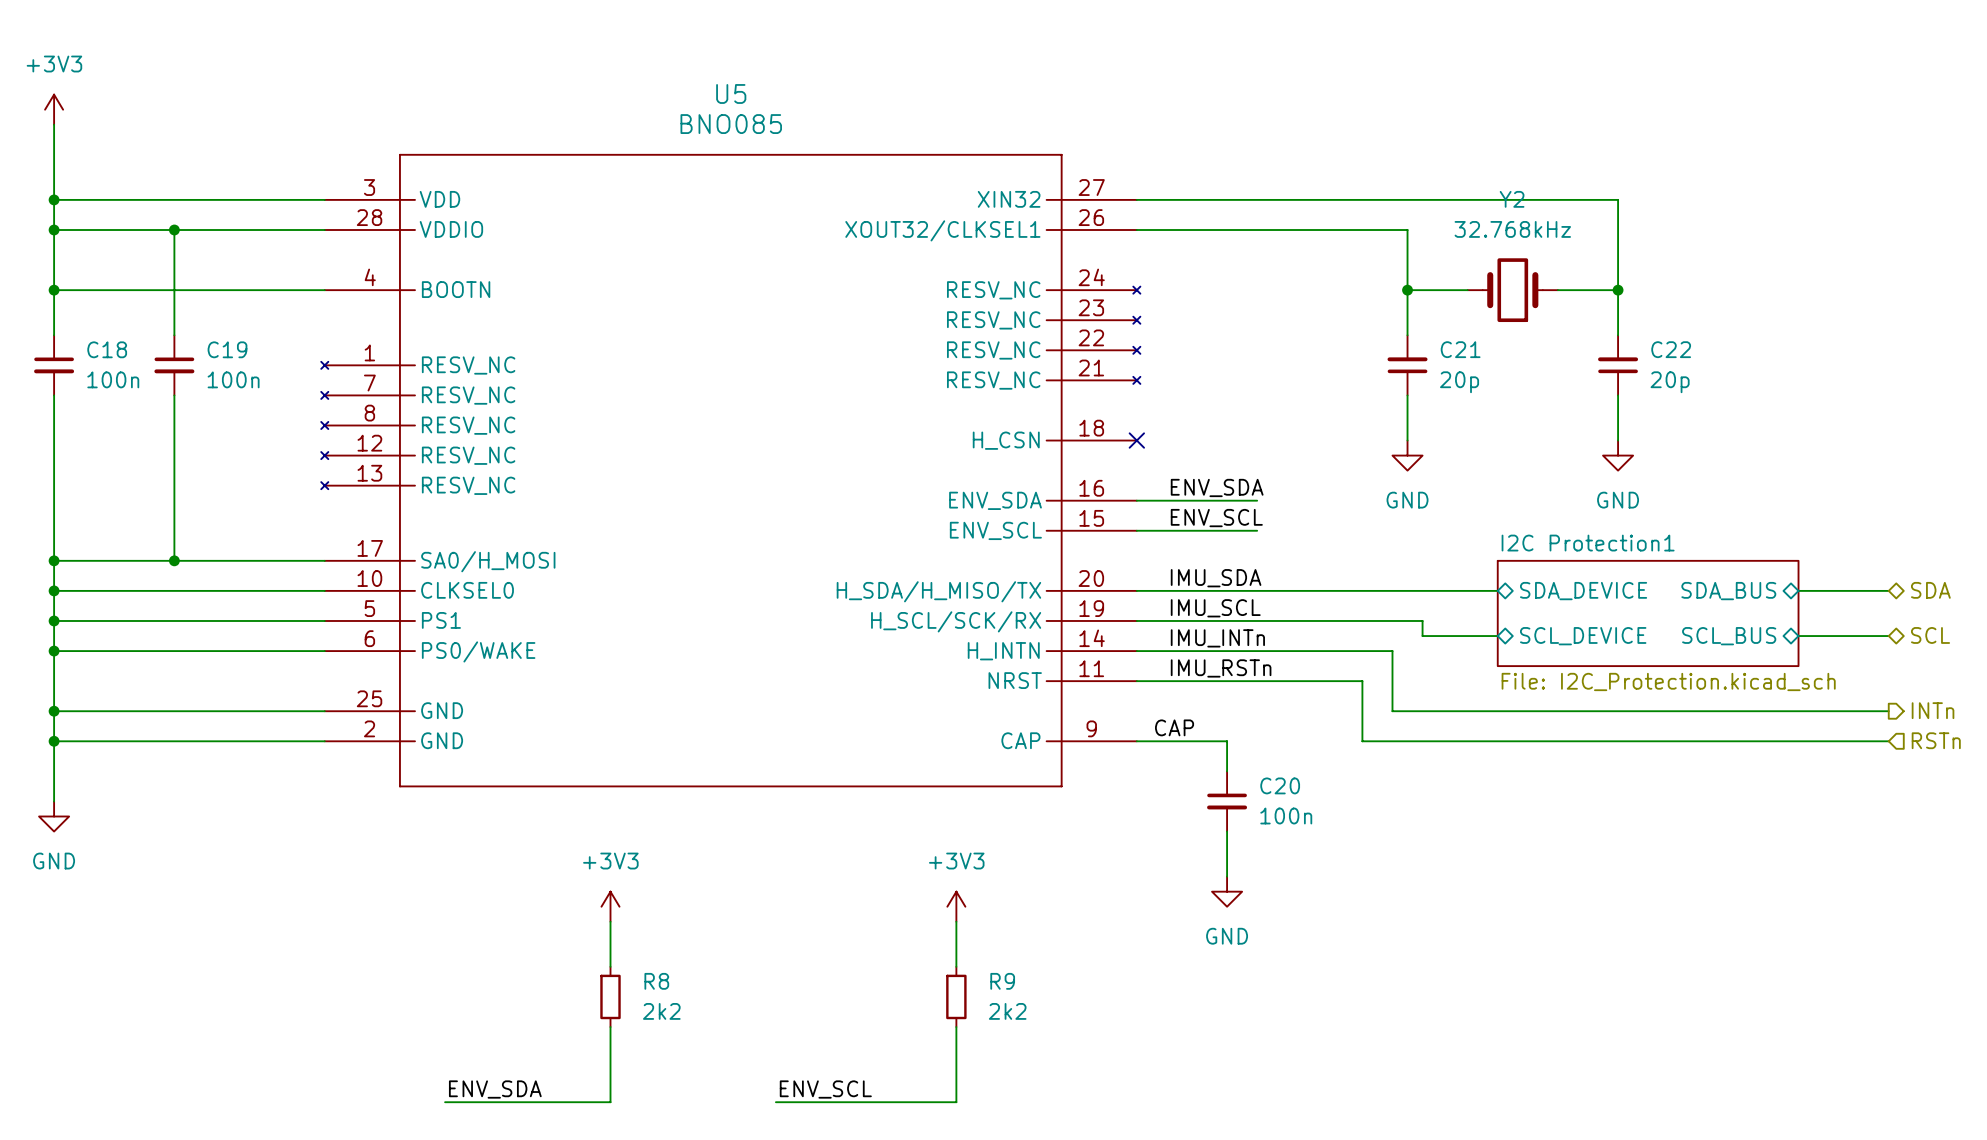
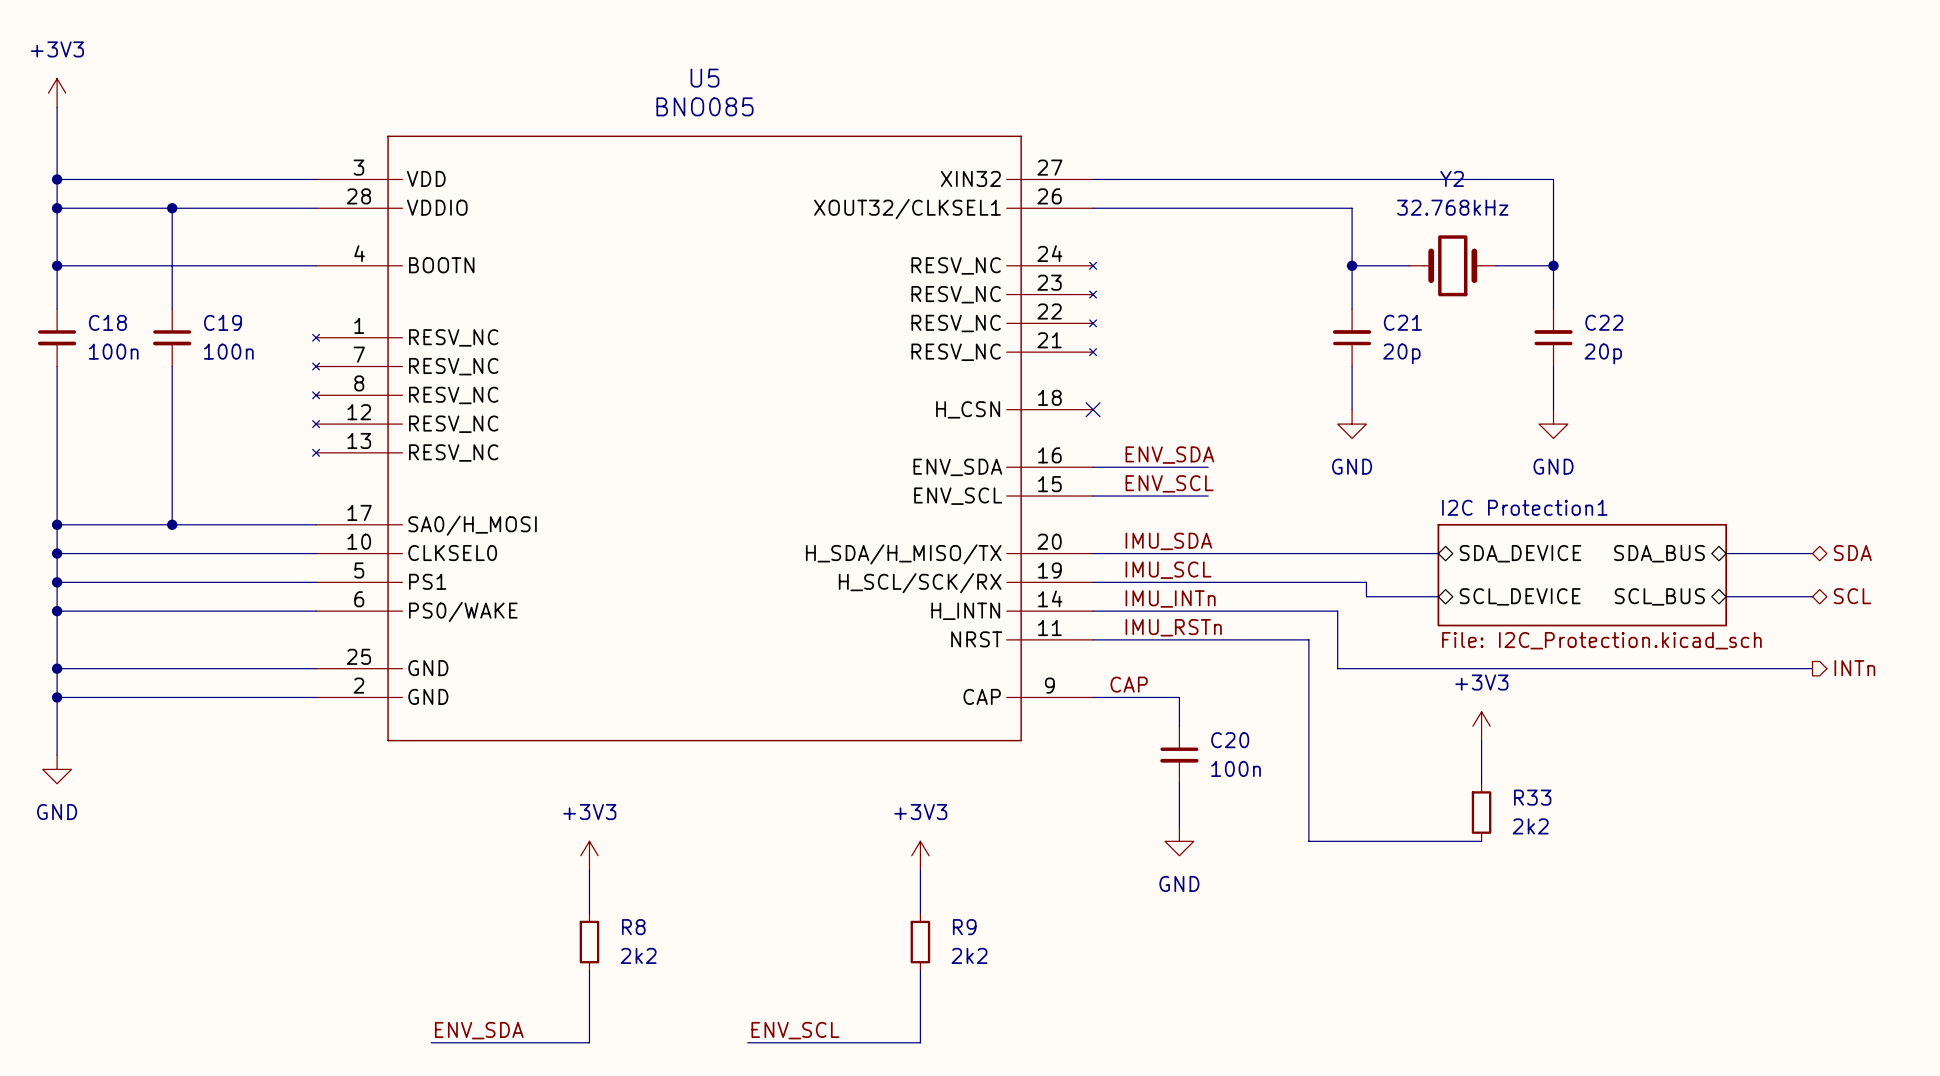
hierarchical label: RSTn (1936, 740) -> none
wire: (1362, 741) (1888, 741) -> (1308, 697) (1308, 841) (1481, 841)
power symbol: none -> +3V3 (1481, 726)
wire: none -> (1481, 740) (1481, 783)
R33: none -> 2k2 (1481, 812)

